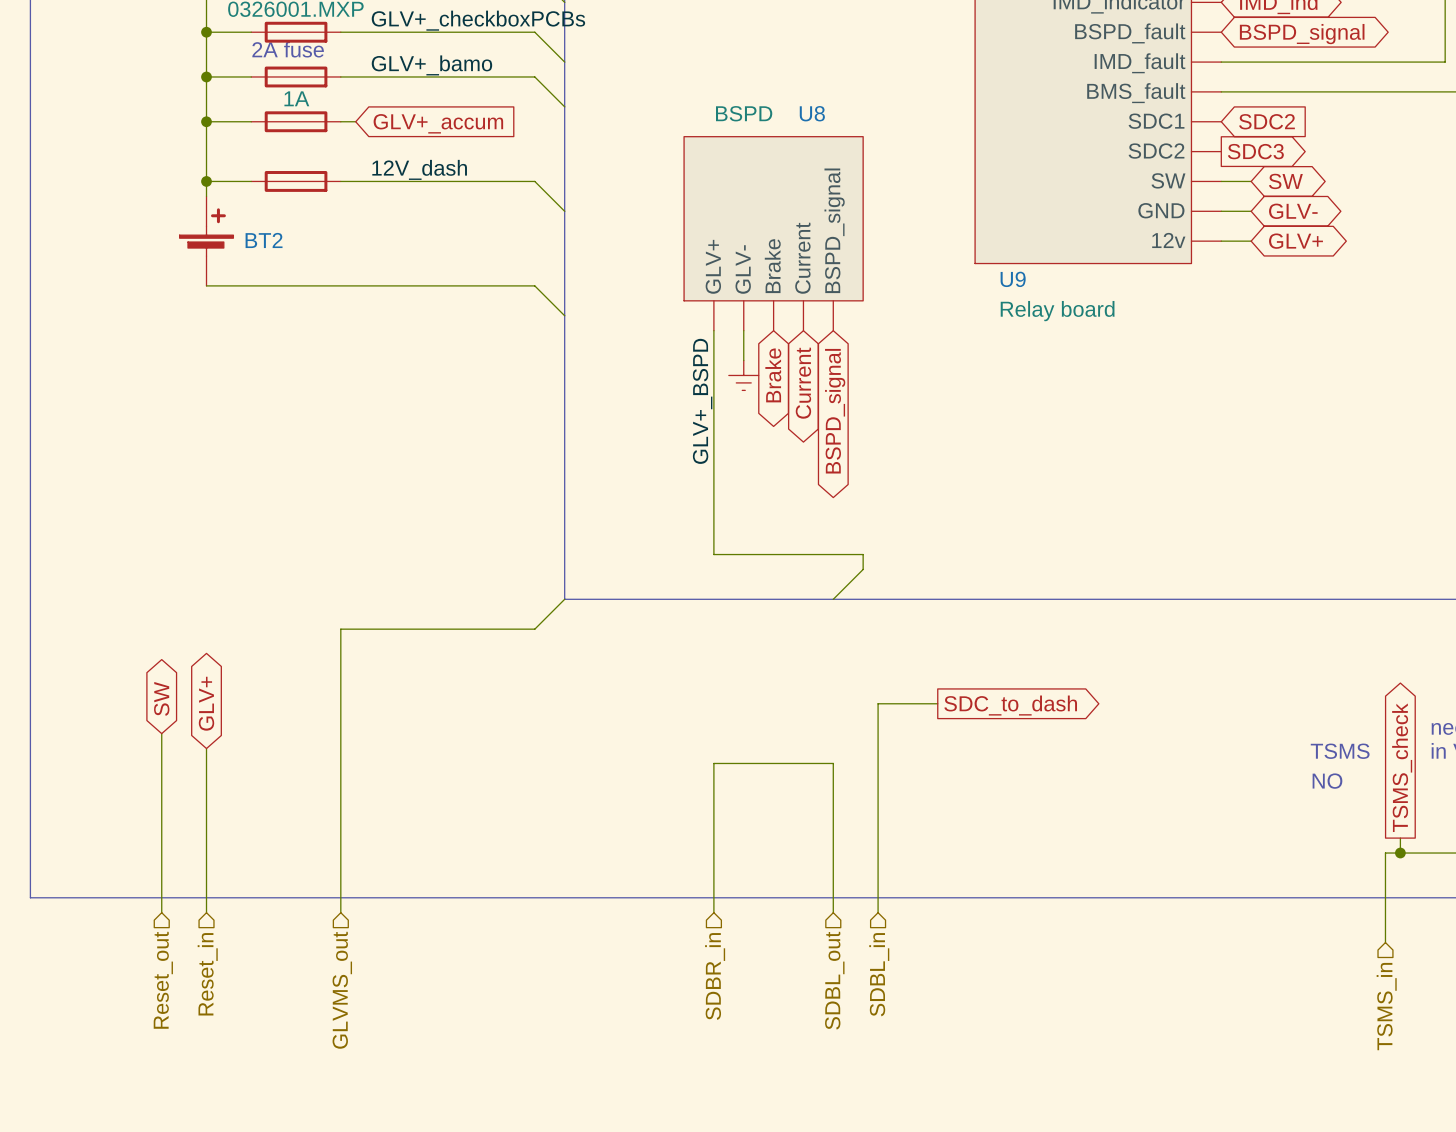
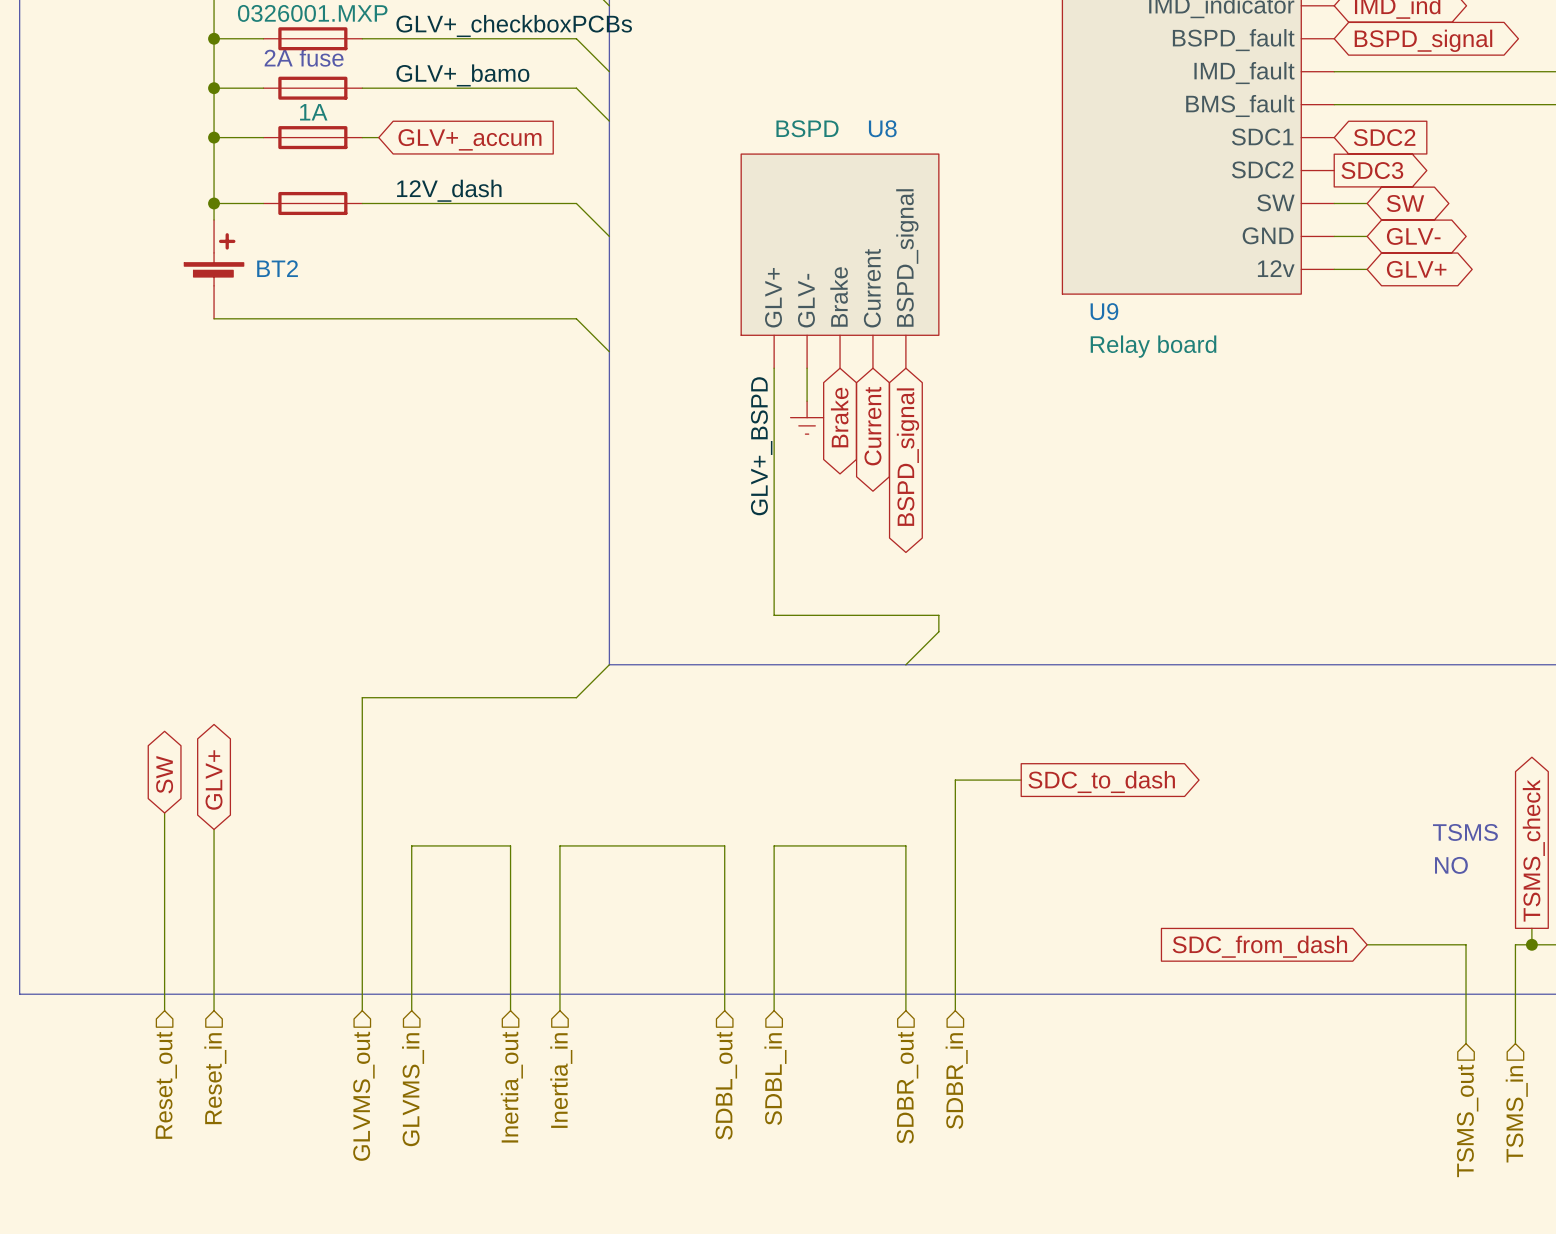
wire: none -> (1367, 944) (1466, 944) (1466, 1043)
global label: none -> SDC_from_dash (1259, 946)
wire: none -> (411, 1010) (411, 845) (510, 845) (510, 1010)
wire: none -> (559, 1010) (559, 845) (724, 845) (724, 1010)
hierarchical label: SDBL_in (879, 974) -> SDBR_in (956, 1081)
hierarchical label: none -> Inertia_in (561, 1080)
hierarchical label: SDBR_in (715, 976) -> SDBL_in (775, 1079)
hierarchical label: none -> SDBL_out (726, 1085)
hierarchical label: SDBL_out (834, 980) -> SDBR_out (907, 1087)
hierarchical label: none -> Inertia_out (511, 1087)
hierarchical label: none -> GLVMS_in (413, 1089)
hierarchical label: none -> TSMS_out (1467, 1120)

